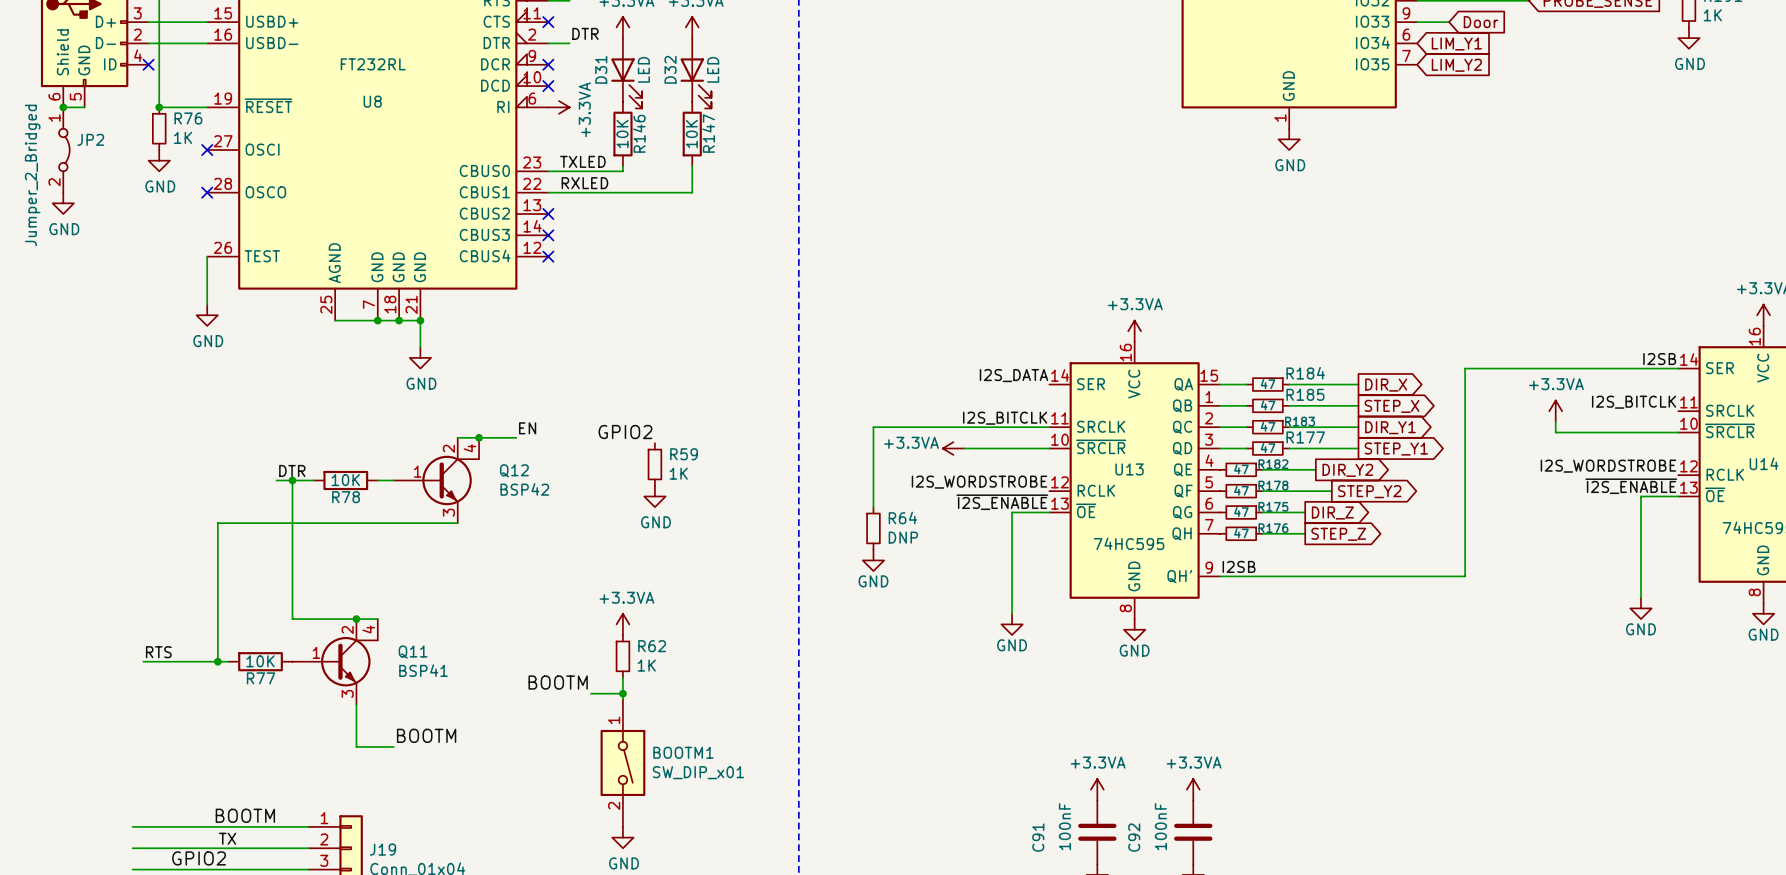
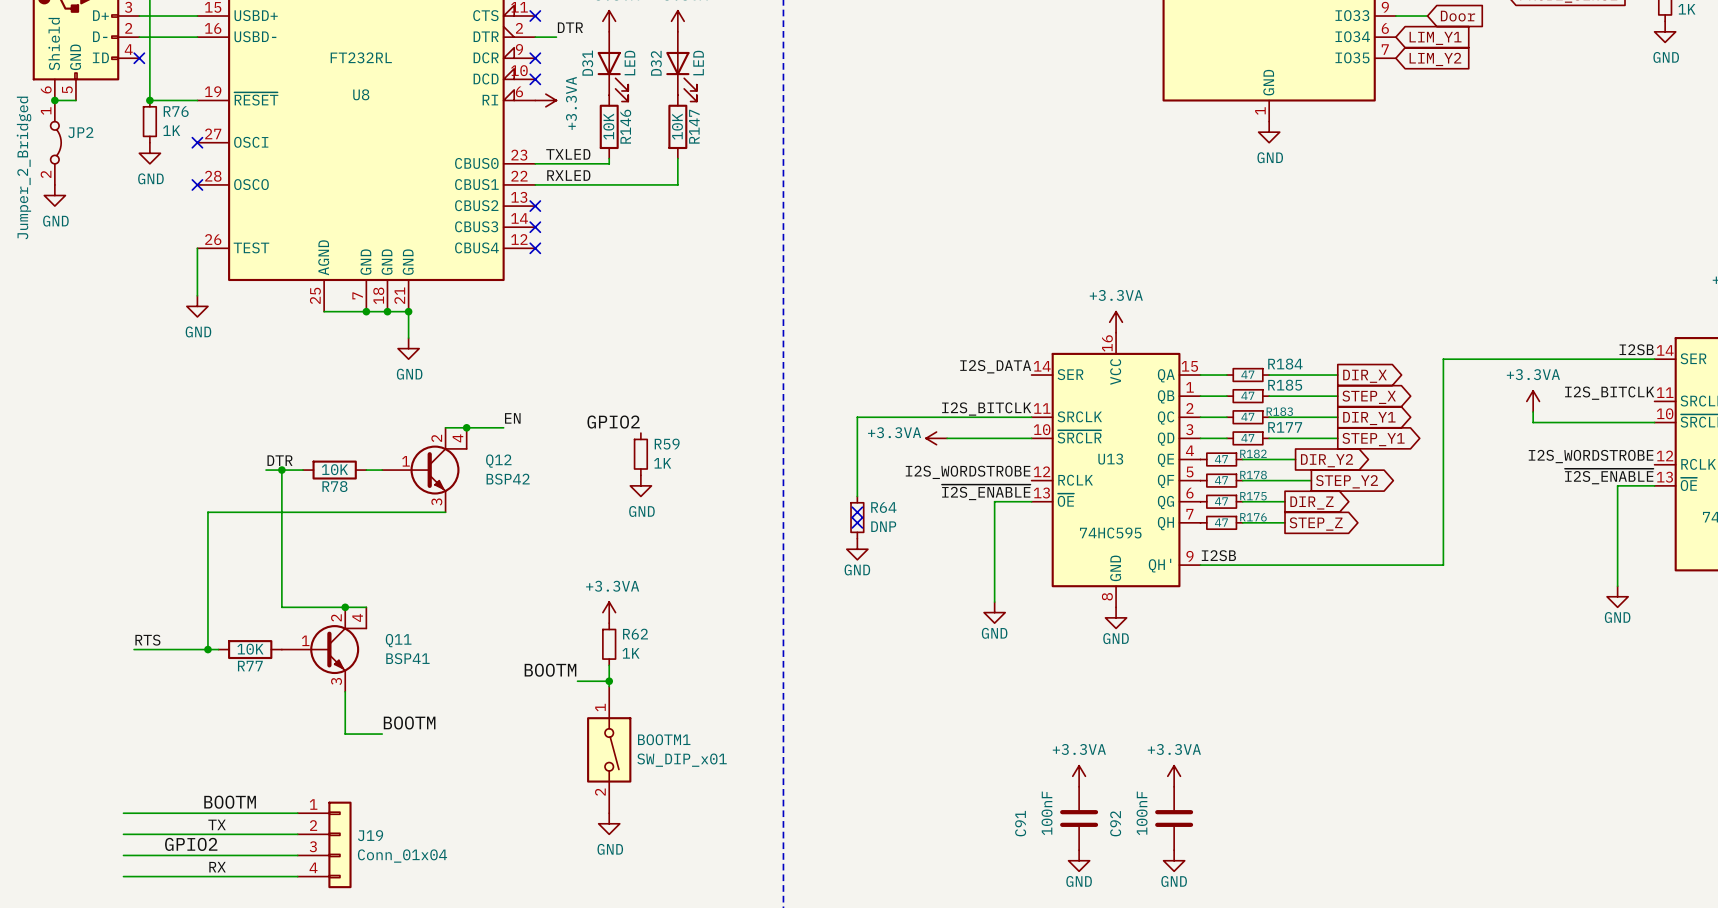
no-connect mark: none -> (857, 512)
no-connect mark: none -> (857, 522)

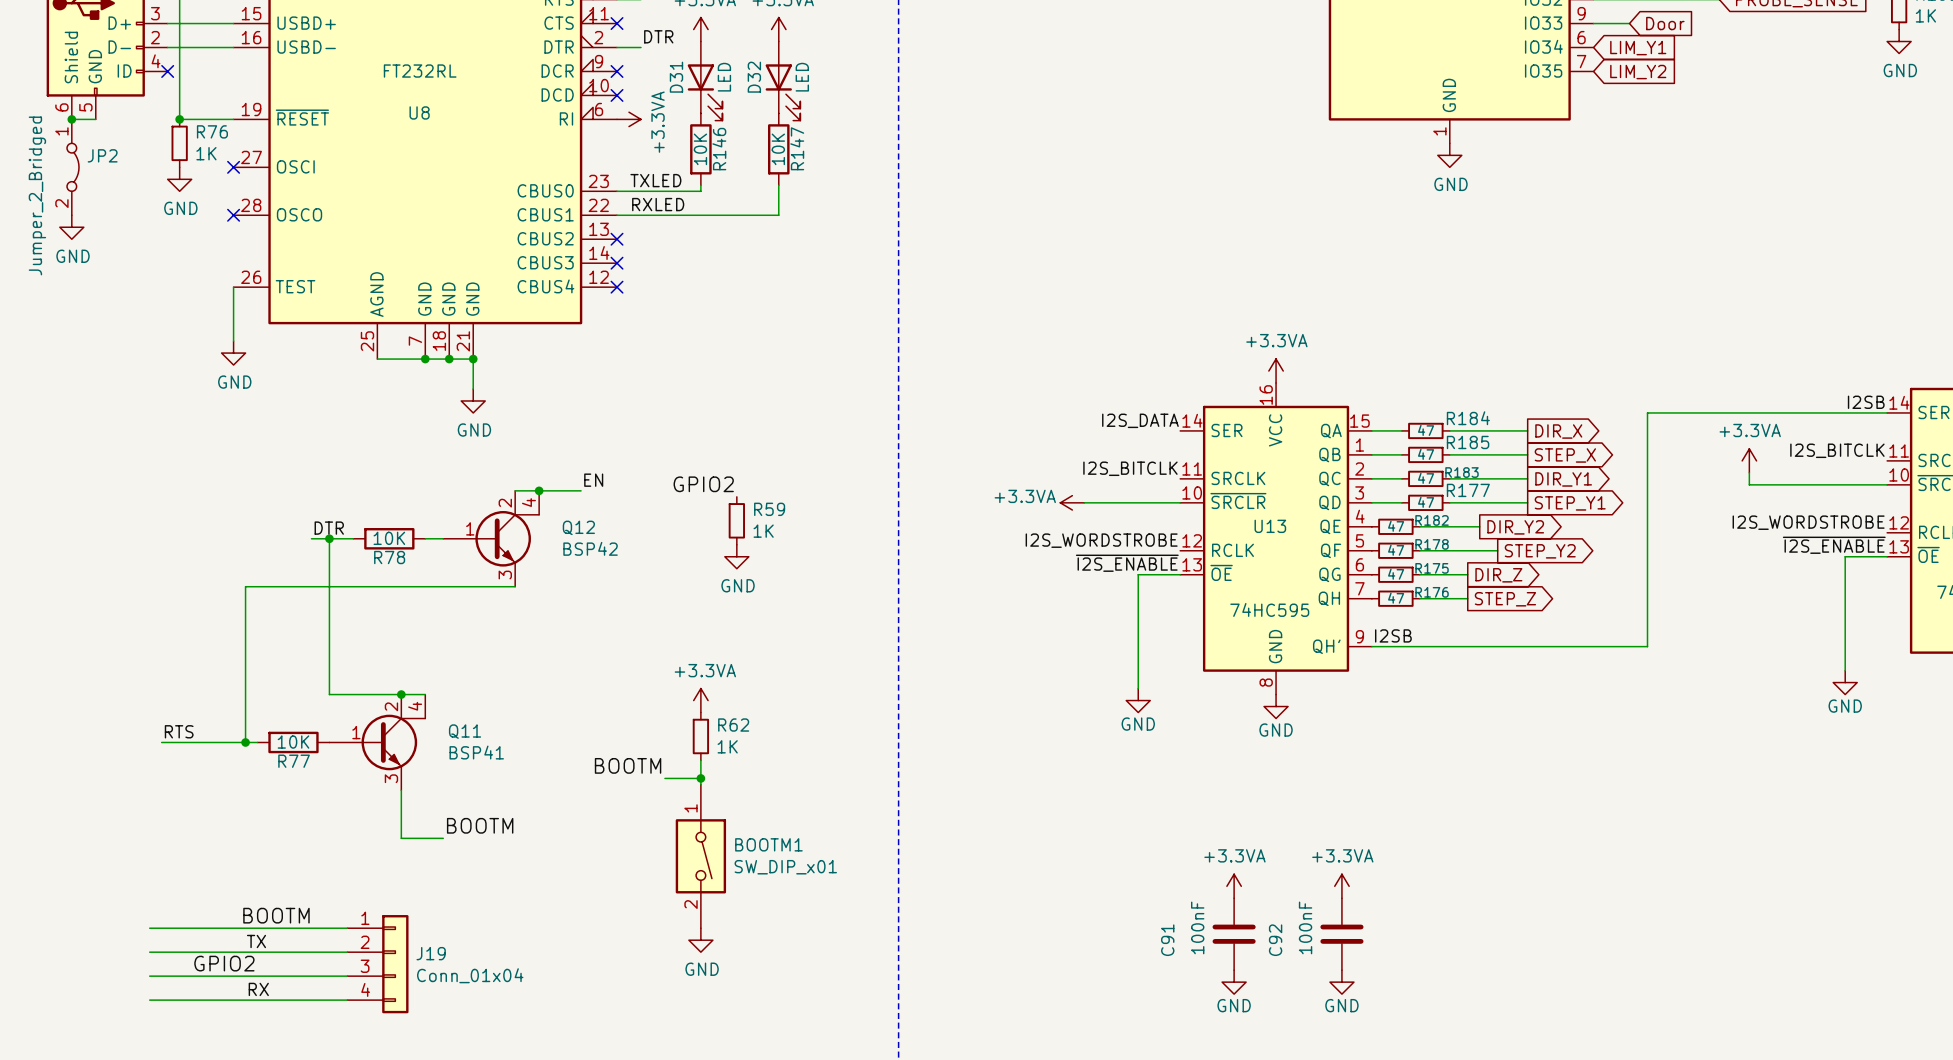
wire: (1031, 417) (857, 417) (857, 496) -> none
no-connect mark: (857, 512) -> none
R64: DNP (857, 517) -> none
no-connect mark: (857, 522) -> none
power symbol: GND (857, 549) -> none

